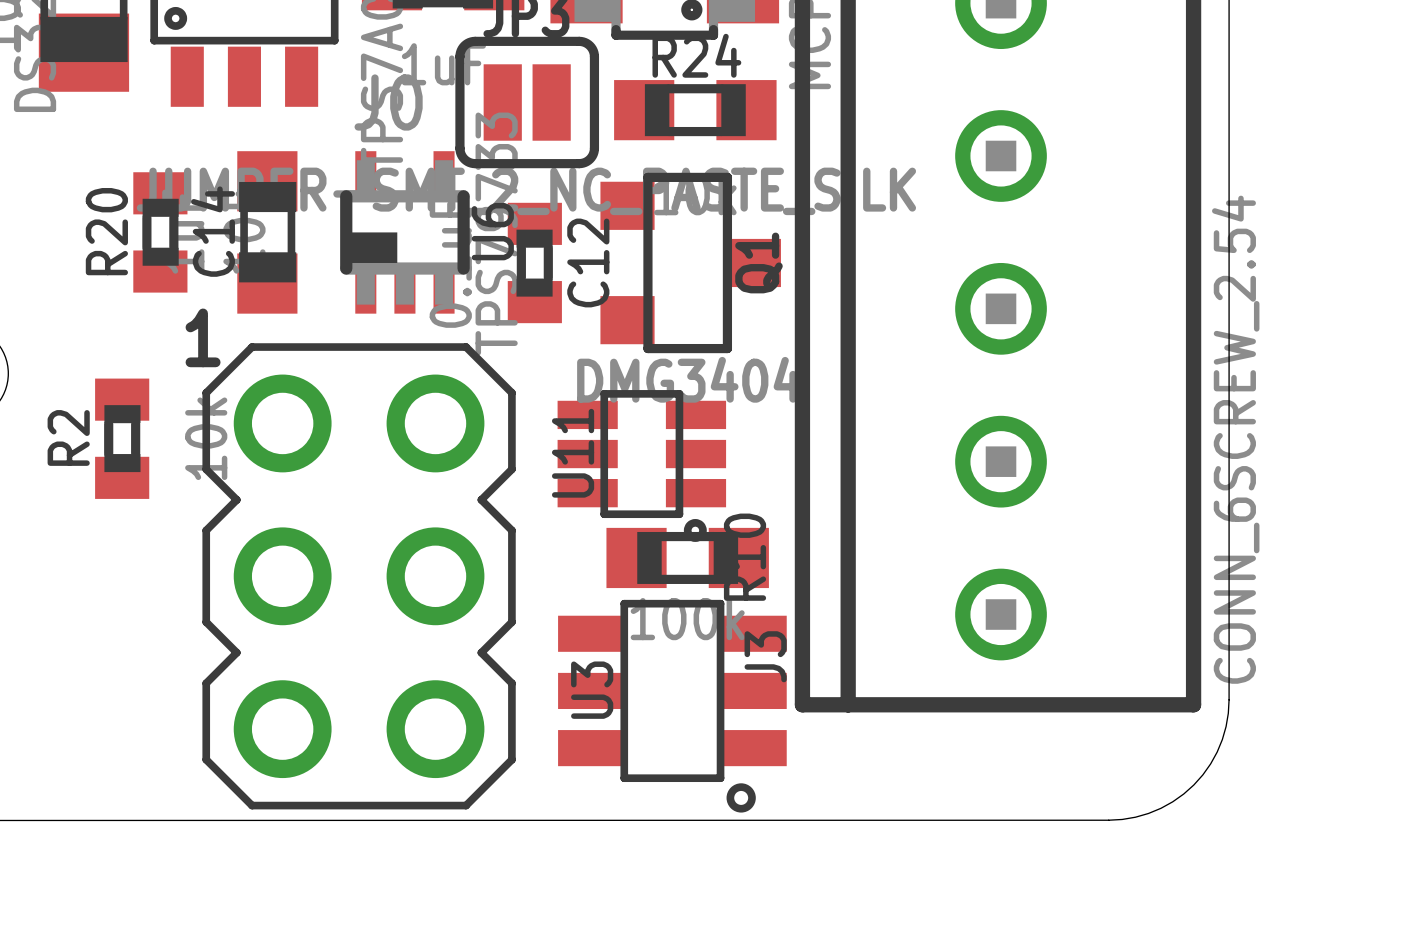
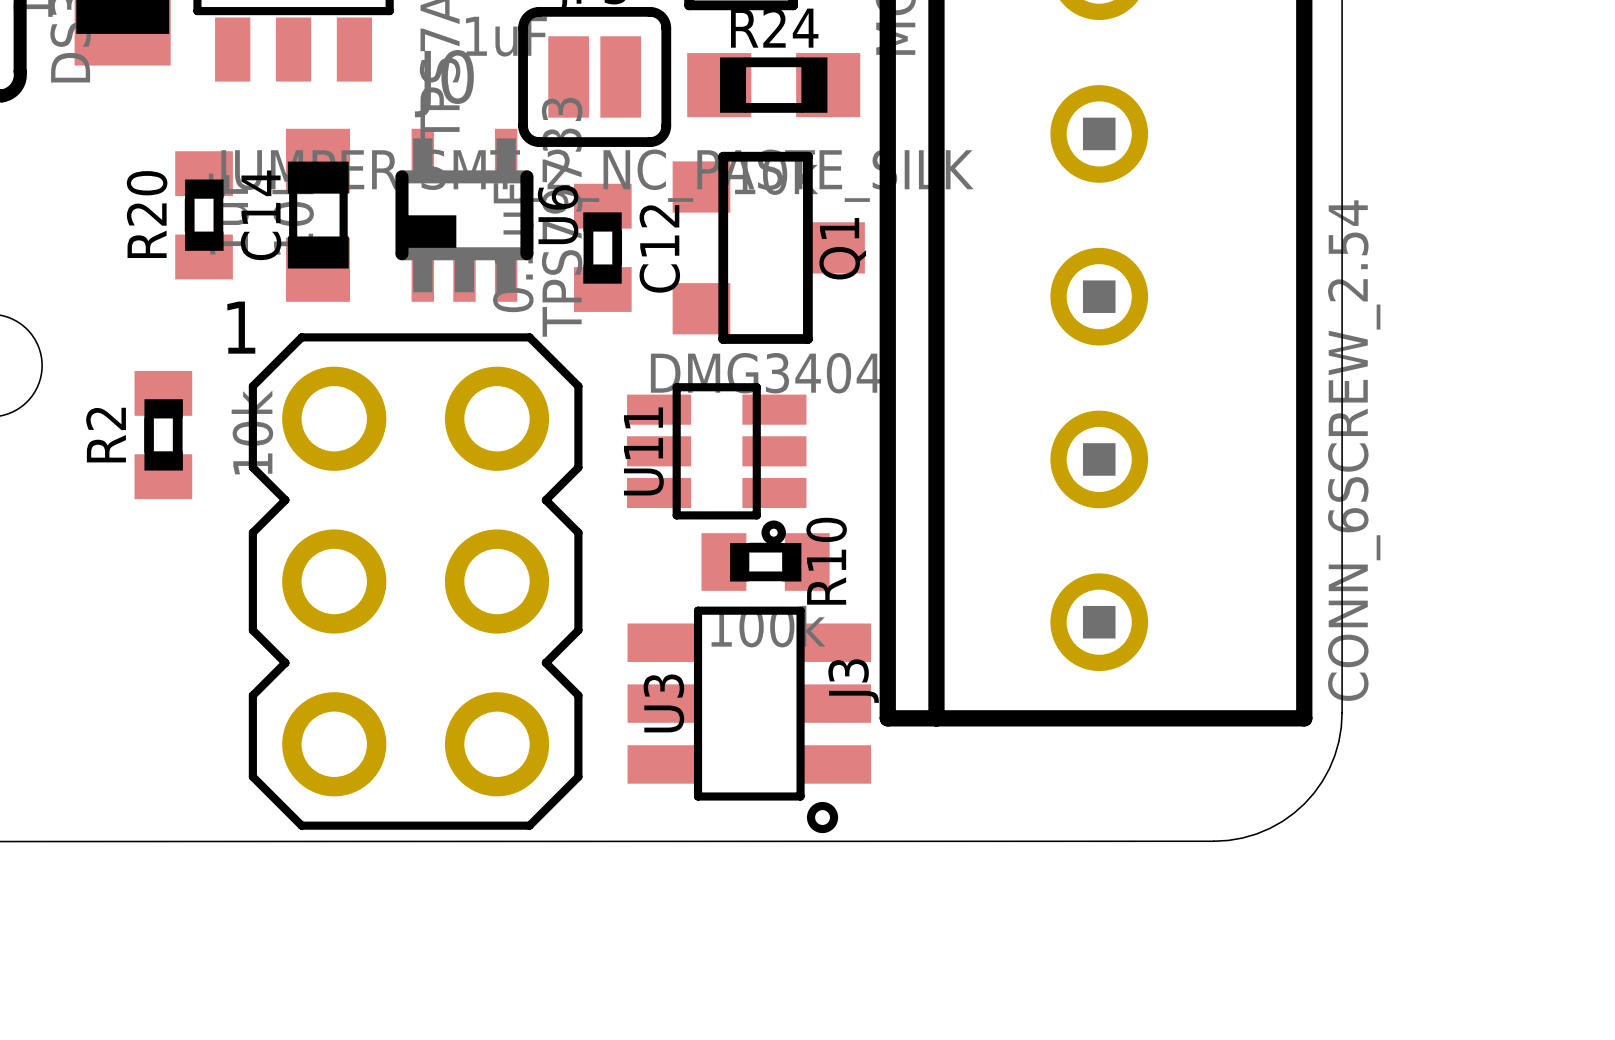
R10 footprint: [606, 527, 769, 589] -> [701, 533, 830, 591]

